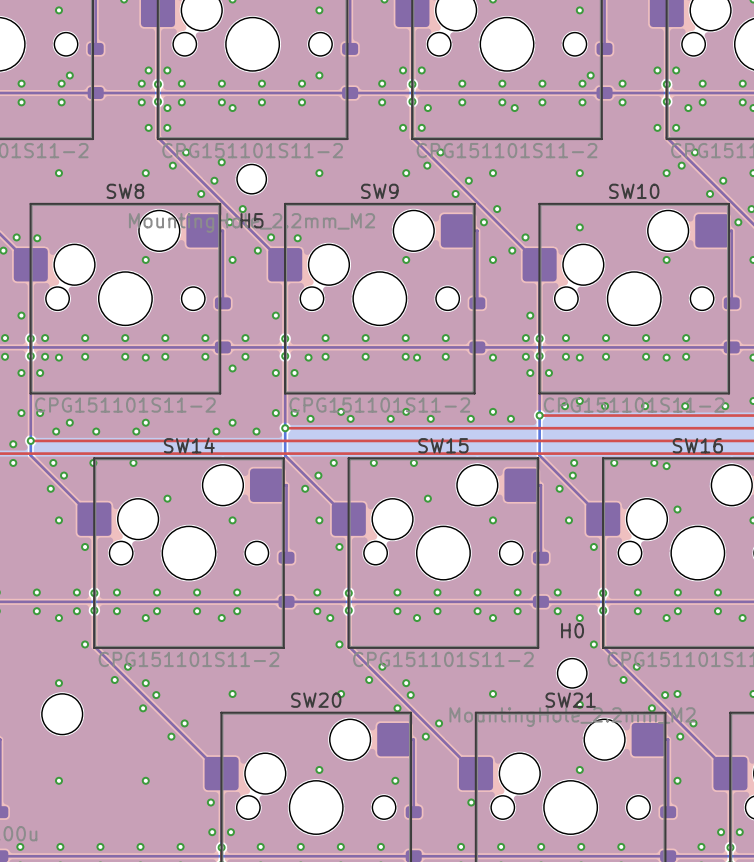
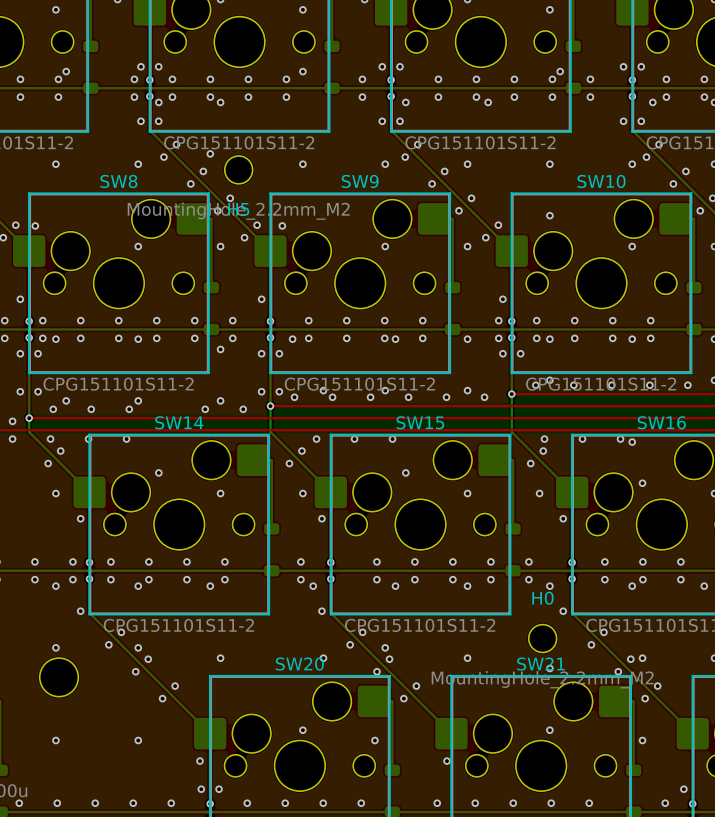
via: (739, 832) -> none

